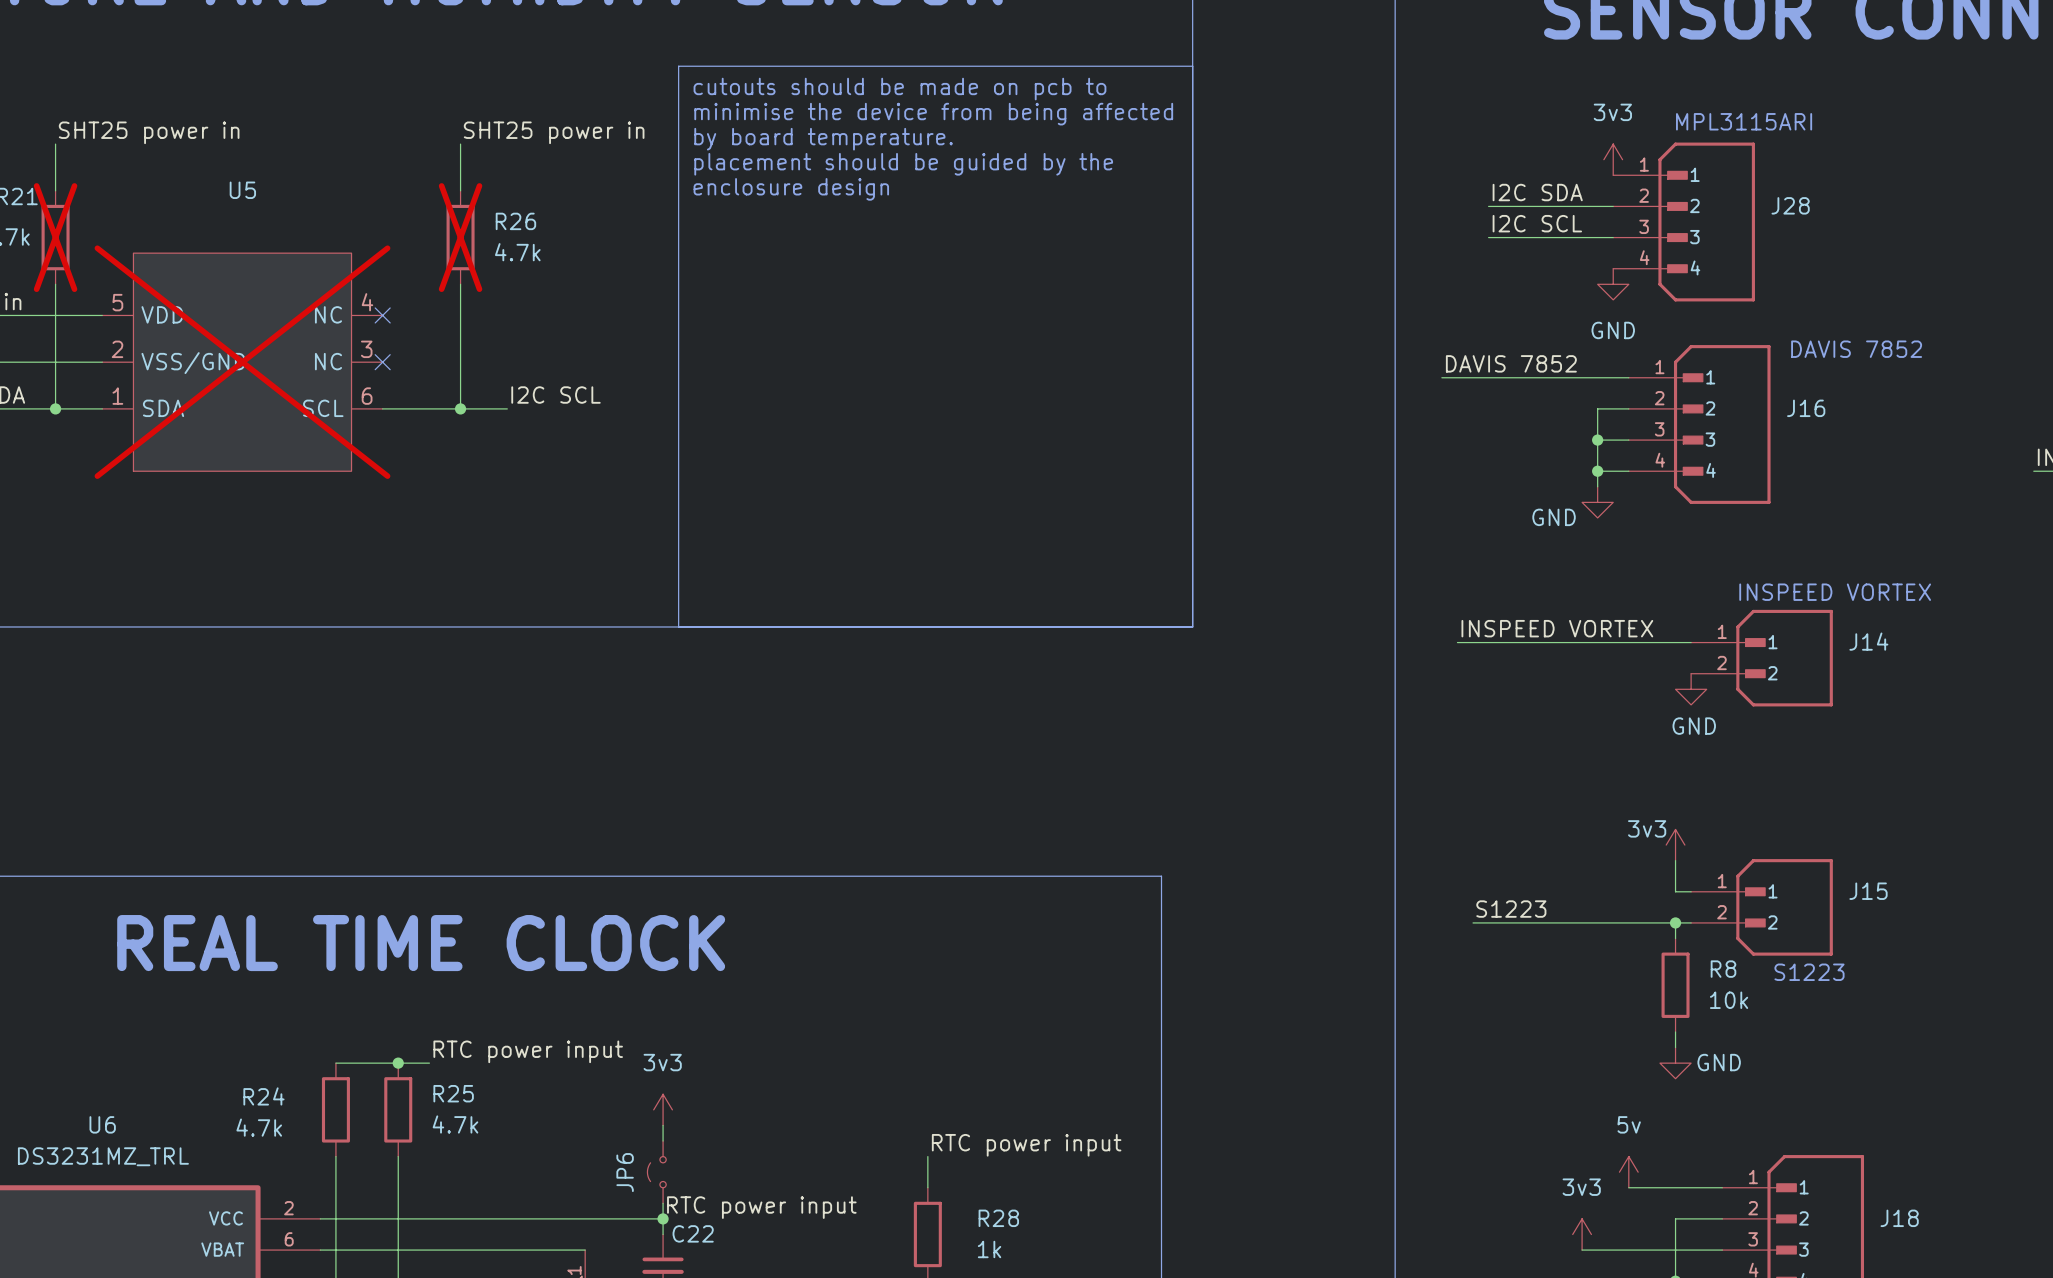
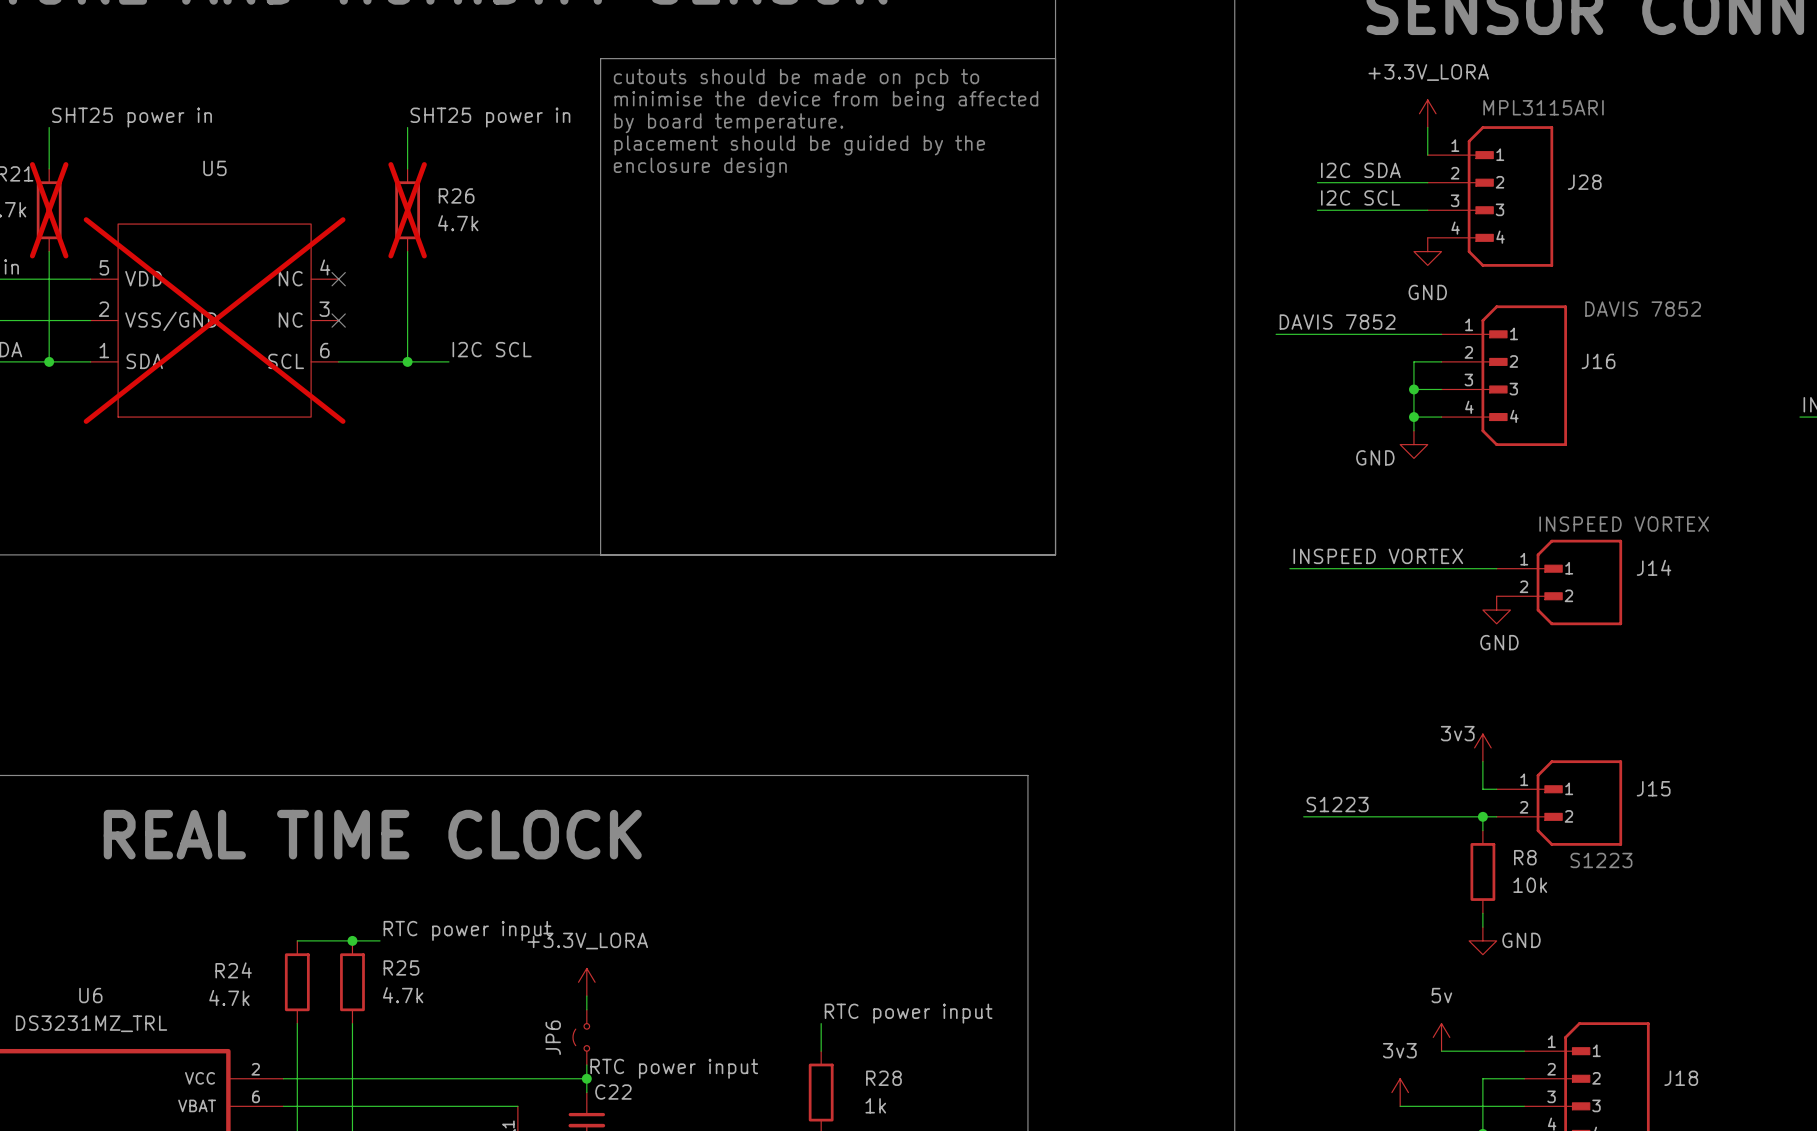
power symbol: none -> +3.3V_LORA (1427, 113)
power symbol: 3v3 (1613, 159) -> none
power symbol: 3v3 (663, 1109) -> +3.3V_LORA (586, 982)

